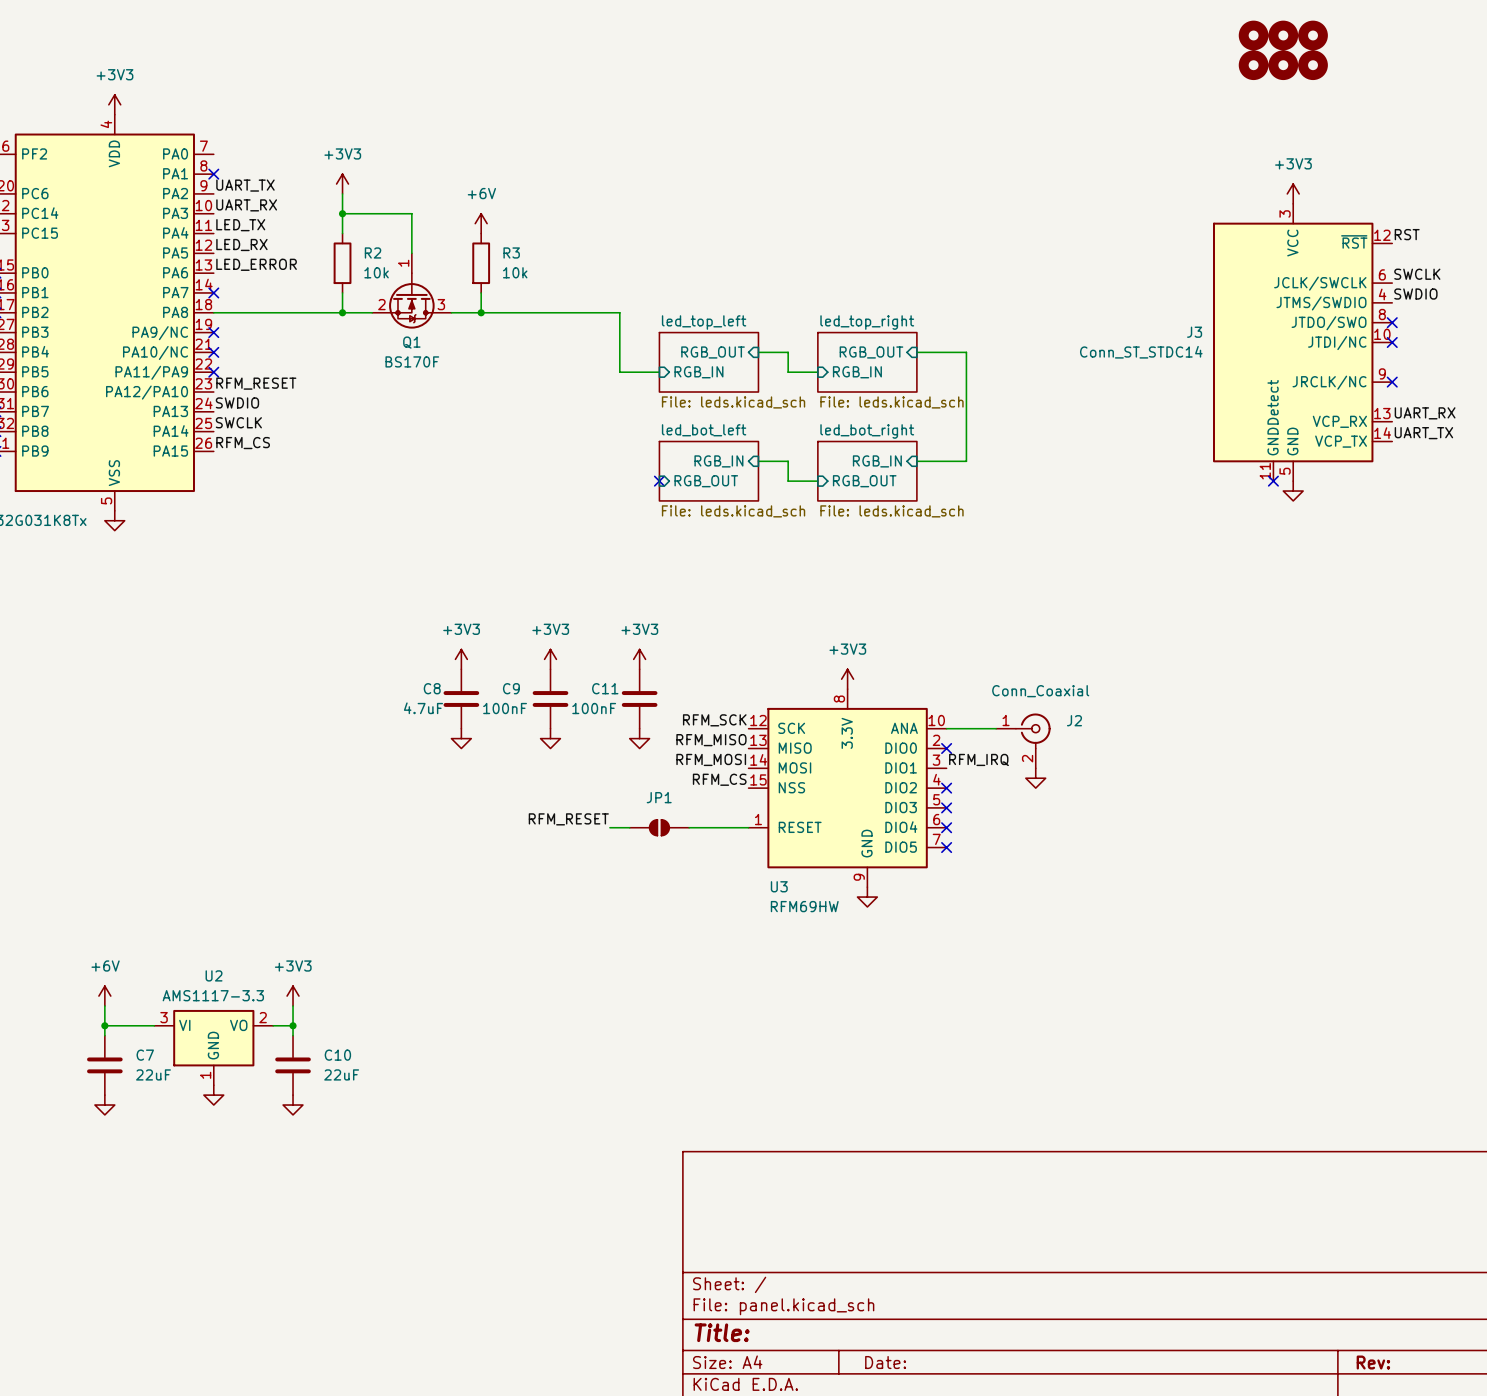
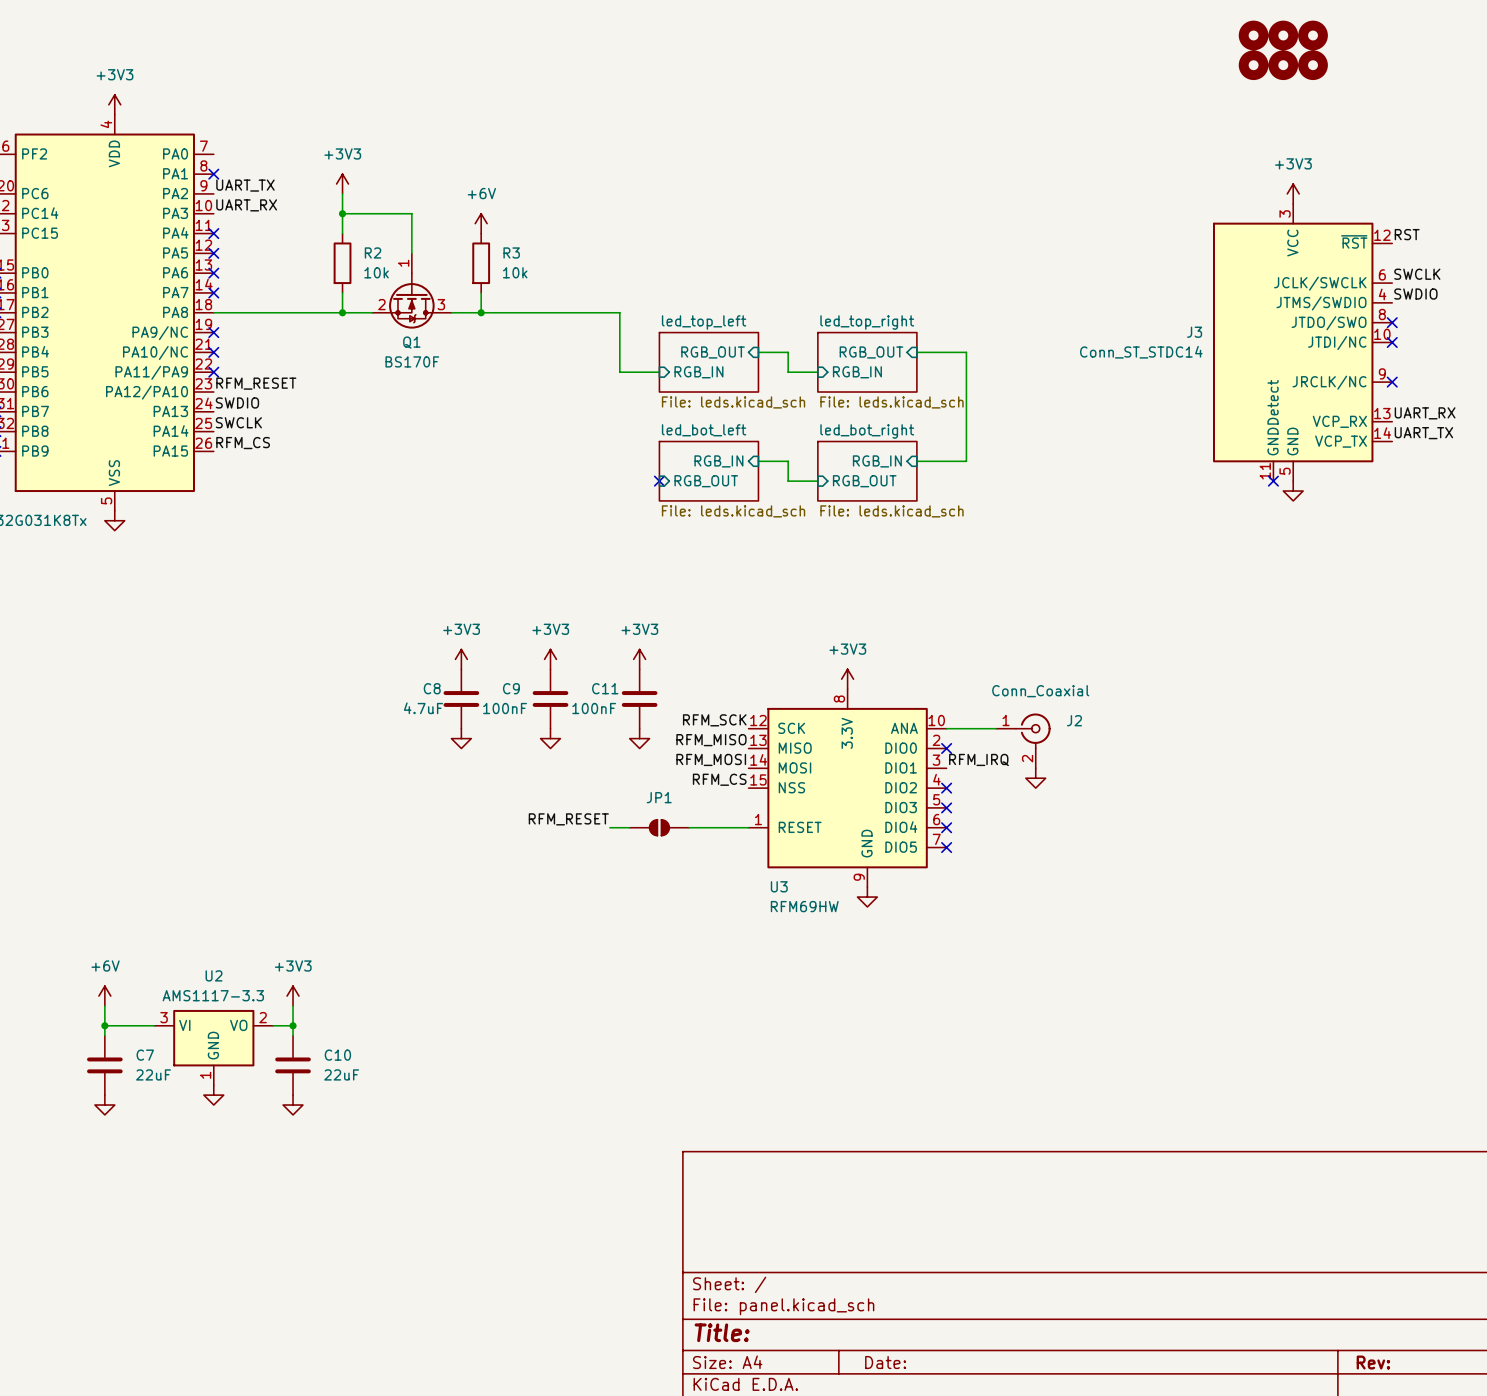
label: LED_TX (240, 225) -> none
no-connect mark: none -> (213, 233)
label: LED_RX (241, 244) -> none
no-connect mark: none -> (213, 253)
label: LED_ERROR (256, 264) -> none
no-connect mark: none -> (213, 273)

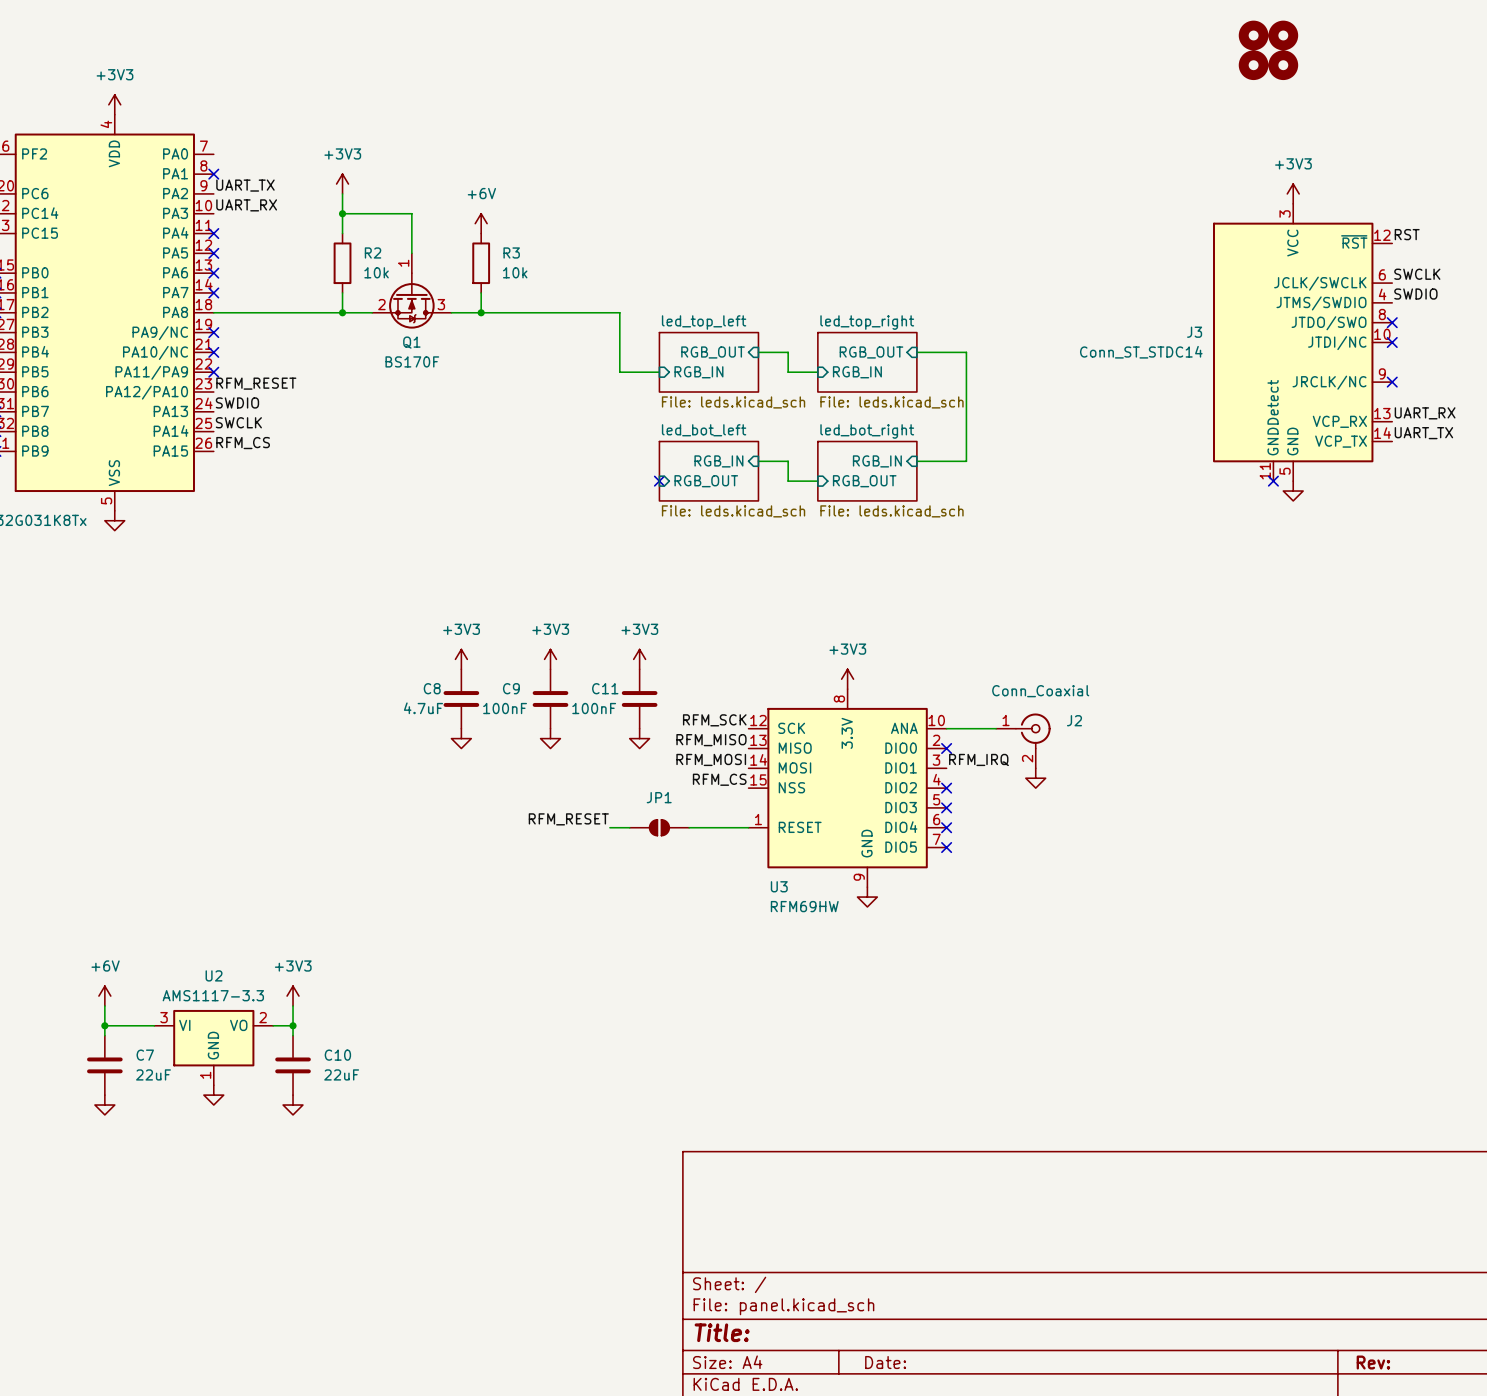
part: (1313, 35) -> none
part: (1313, 65) -> none

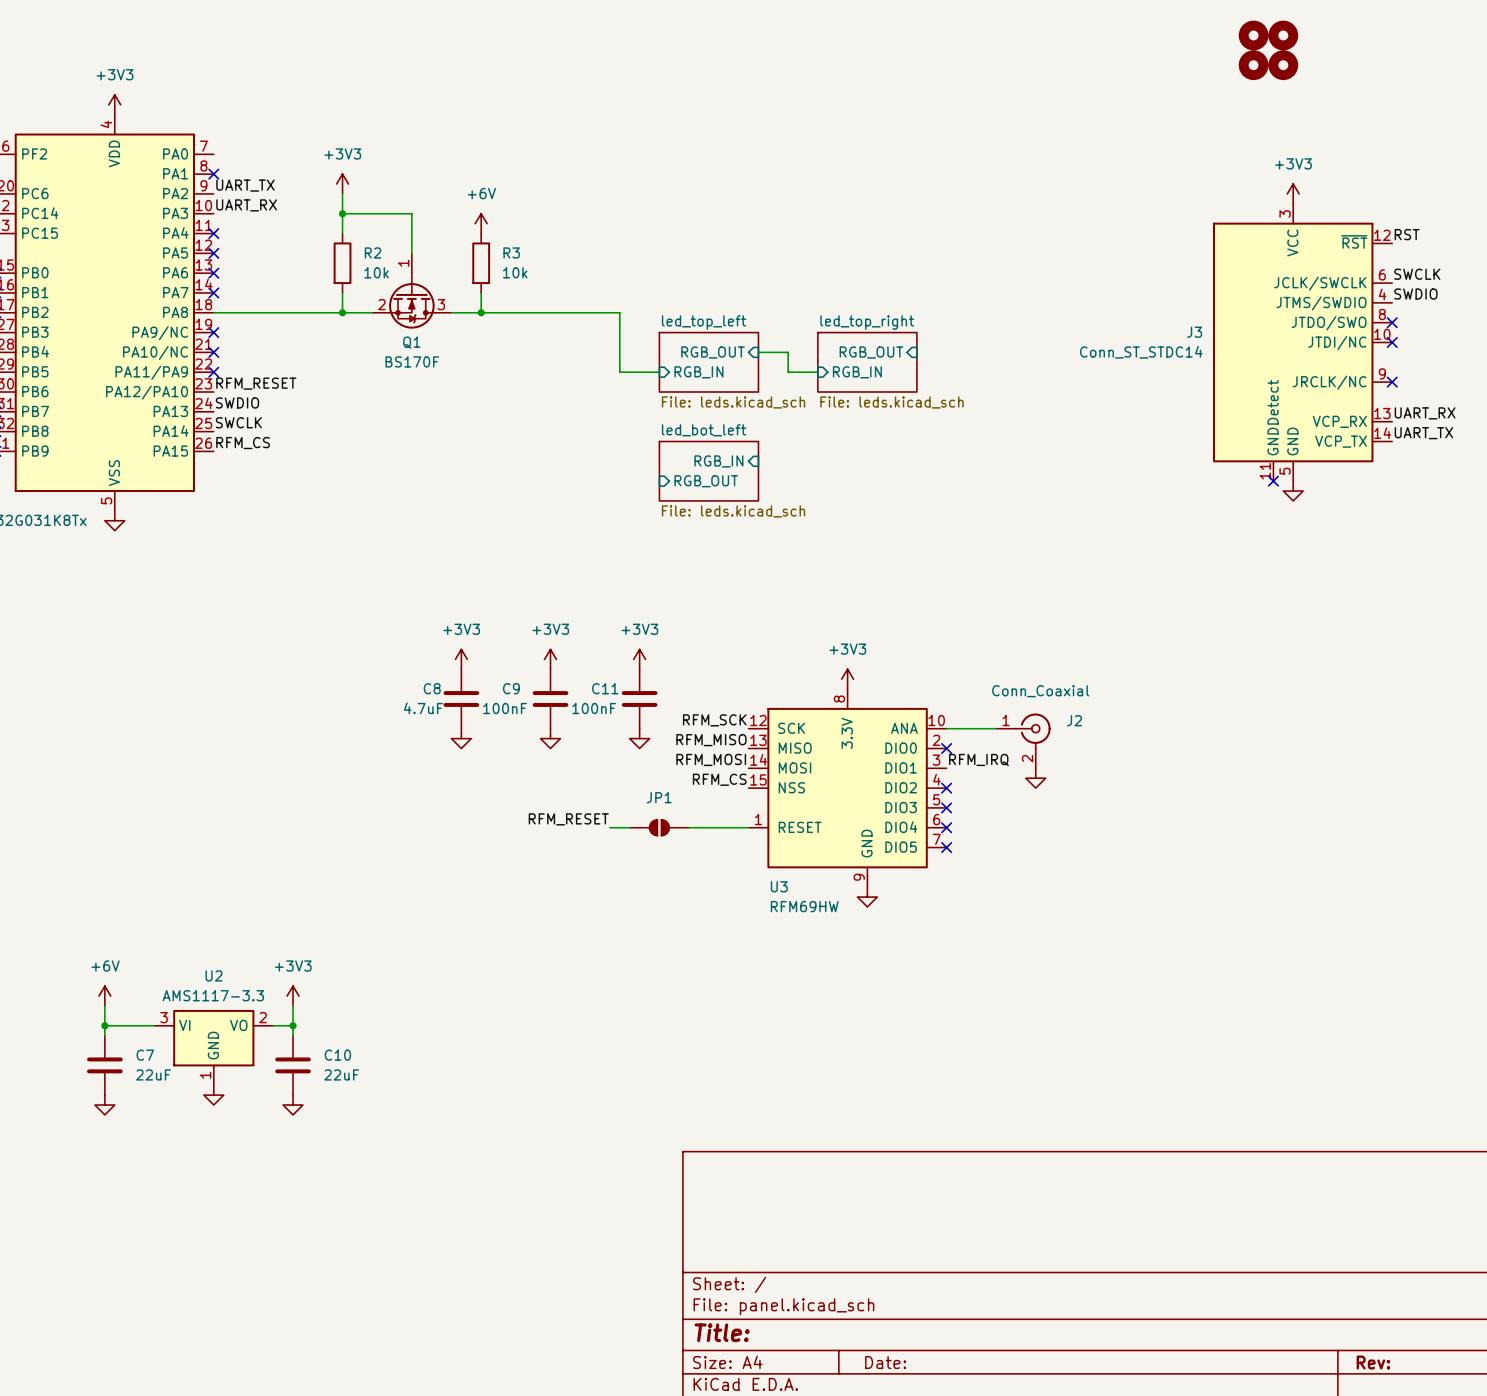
wire: (916, 352) (966, 352) (966, 461) (916, 461) -> none
wire: (758, 461) (788, 461) (788, 481) (817, 481) -> none
sheet pin: RGB_IN (877, 461) -> none
sheet led_bot_right: File: leds.kicad_sch (867, 471) -> none
no-connect mark: (659, 481) -> none
sheet pin: RGB_OUT (864, 481) -> none

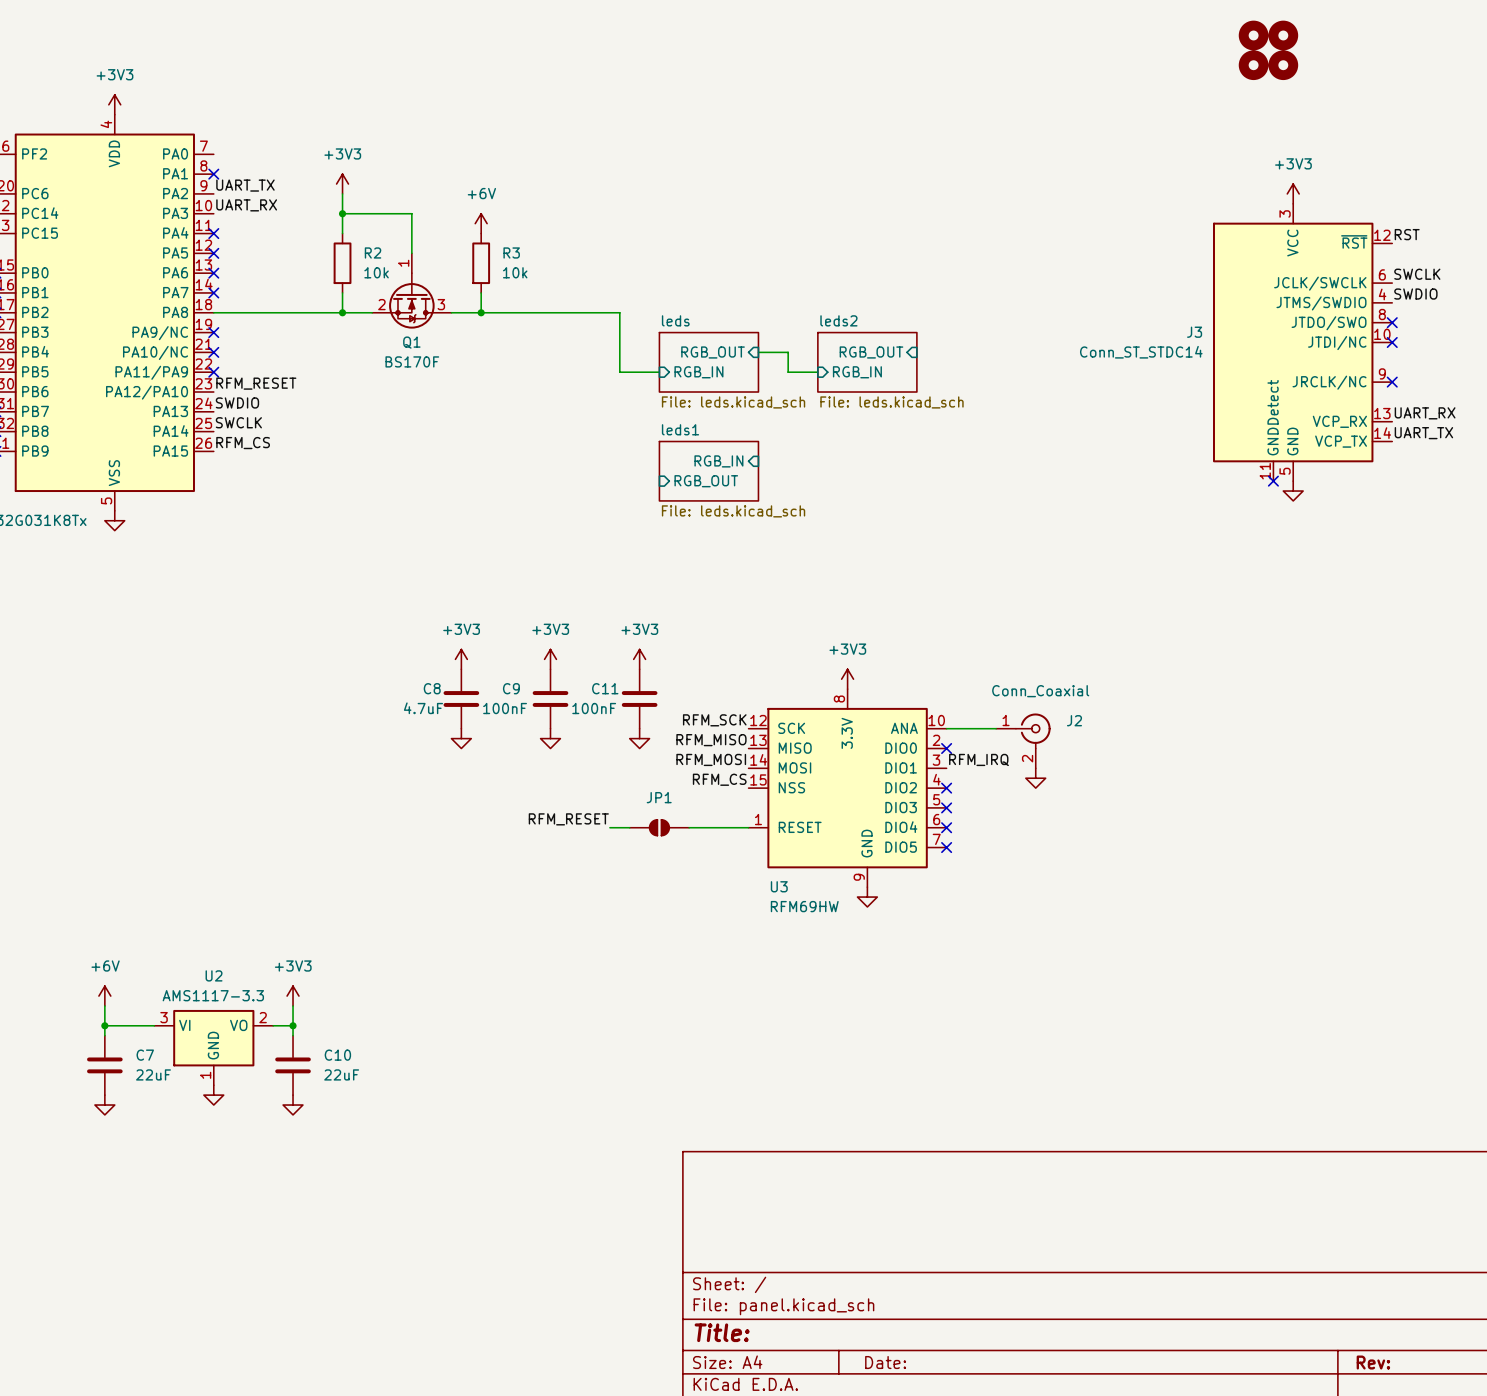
sheet led_top_left name: led_top_left (704, 322) -> leds (675, 320)
sheet led_top_right name: led_top_right (867, 322) -> leds2 (838, 320)
sheet led_bot_left name: led_bot_left (704, 430) -> leds1 (680, 429)

